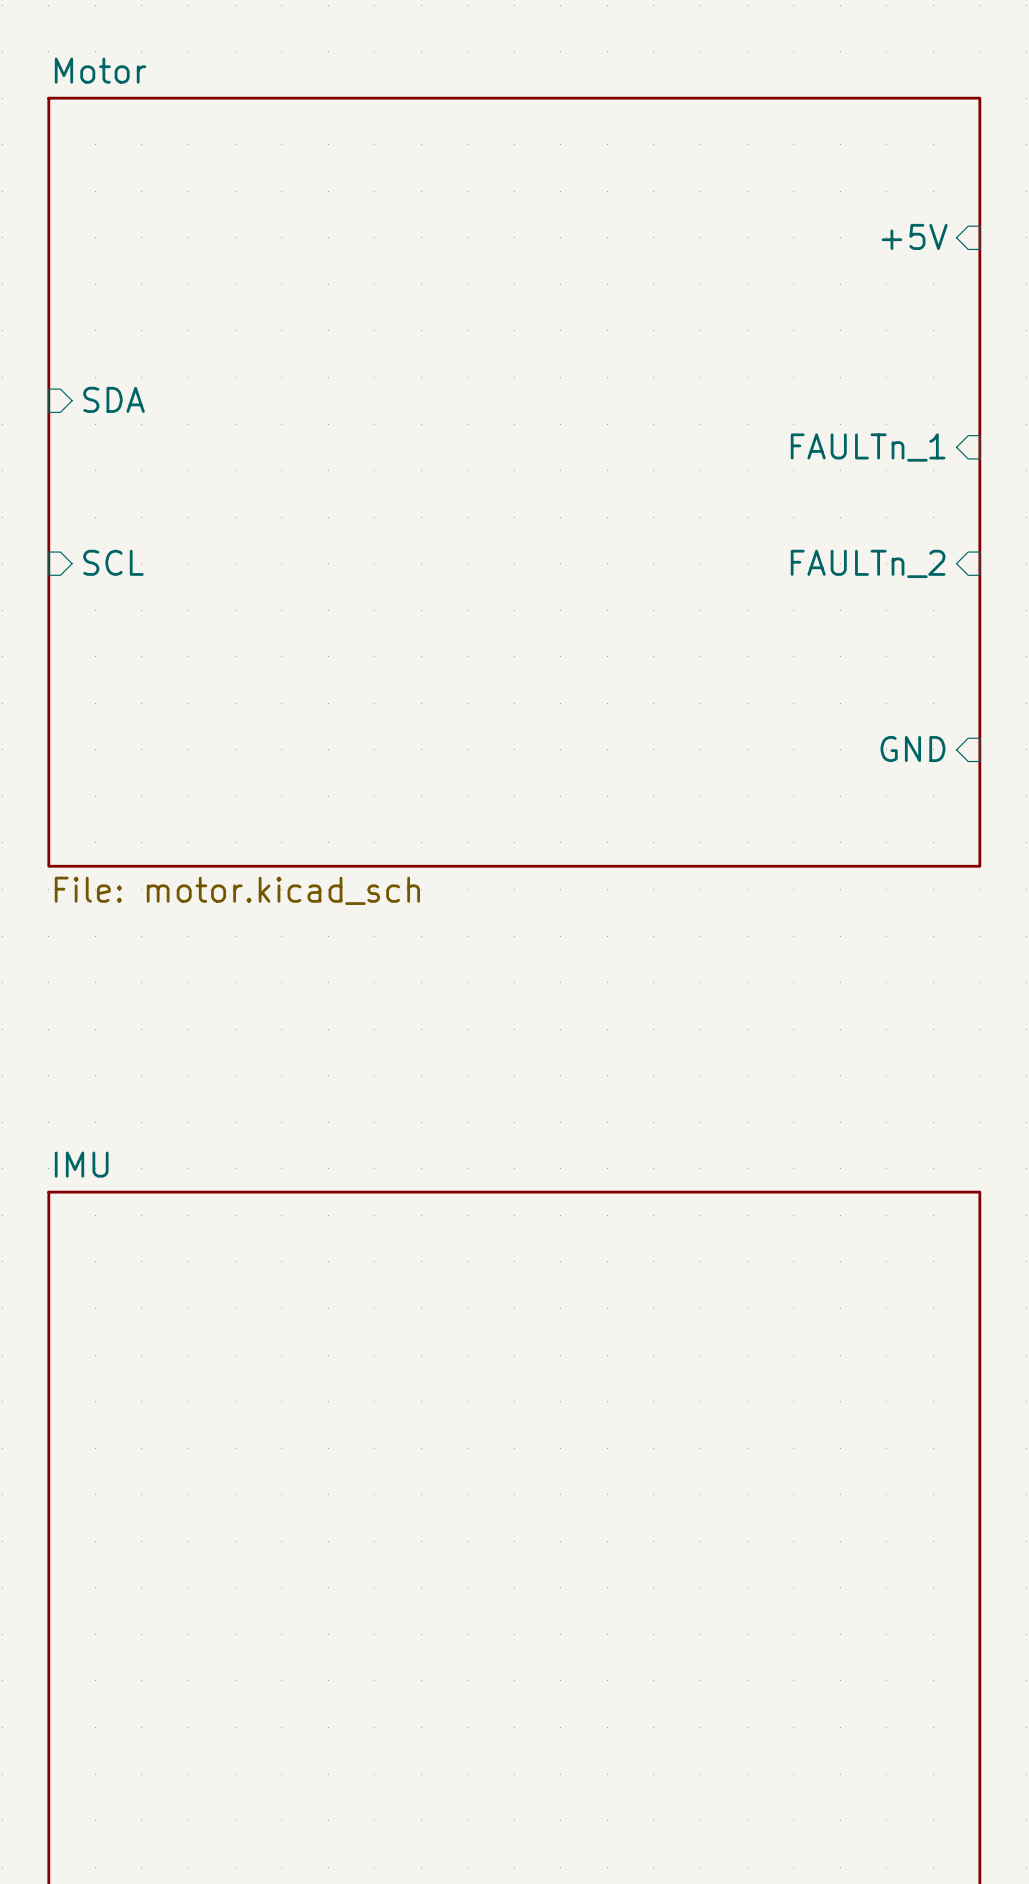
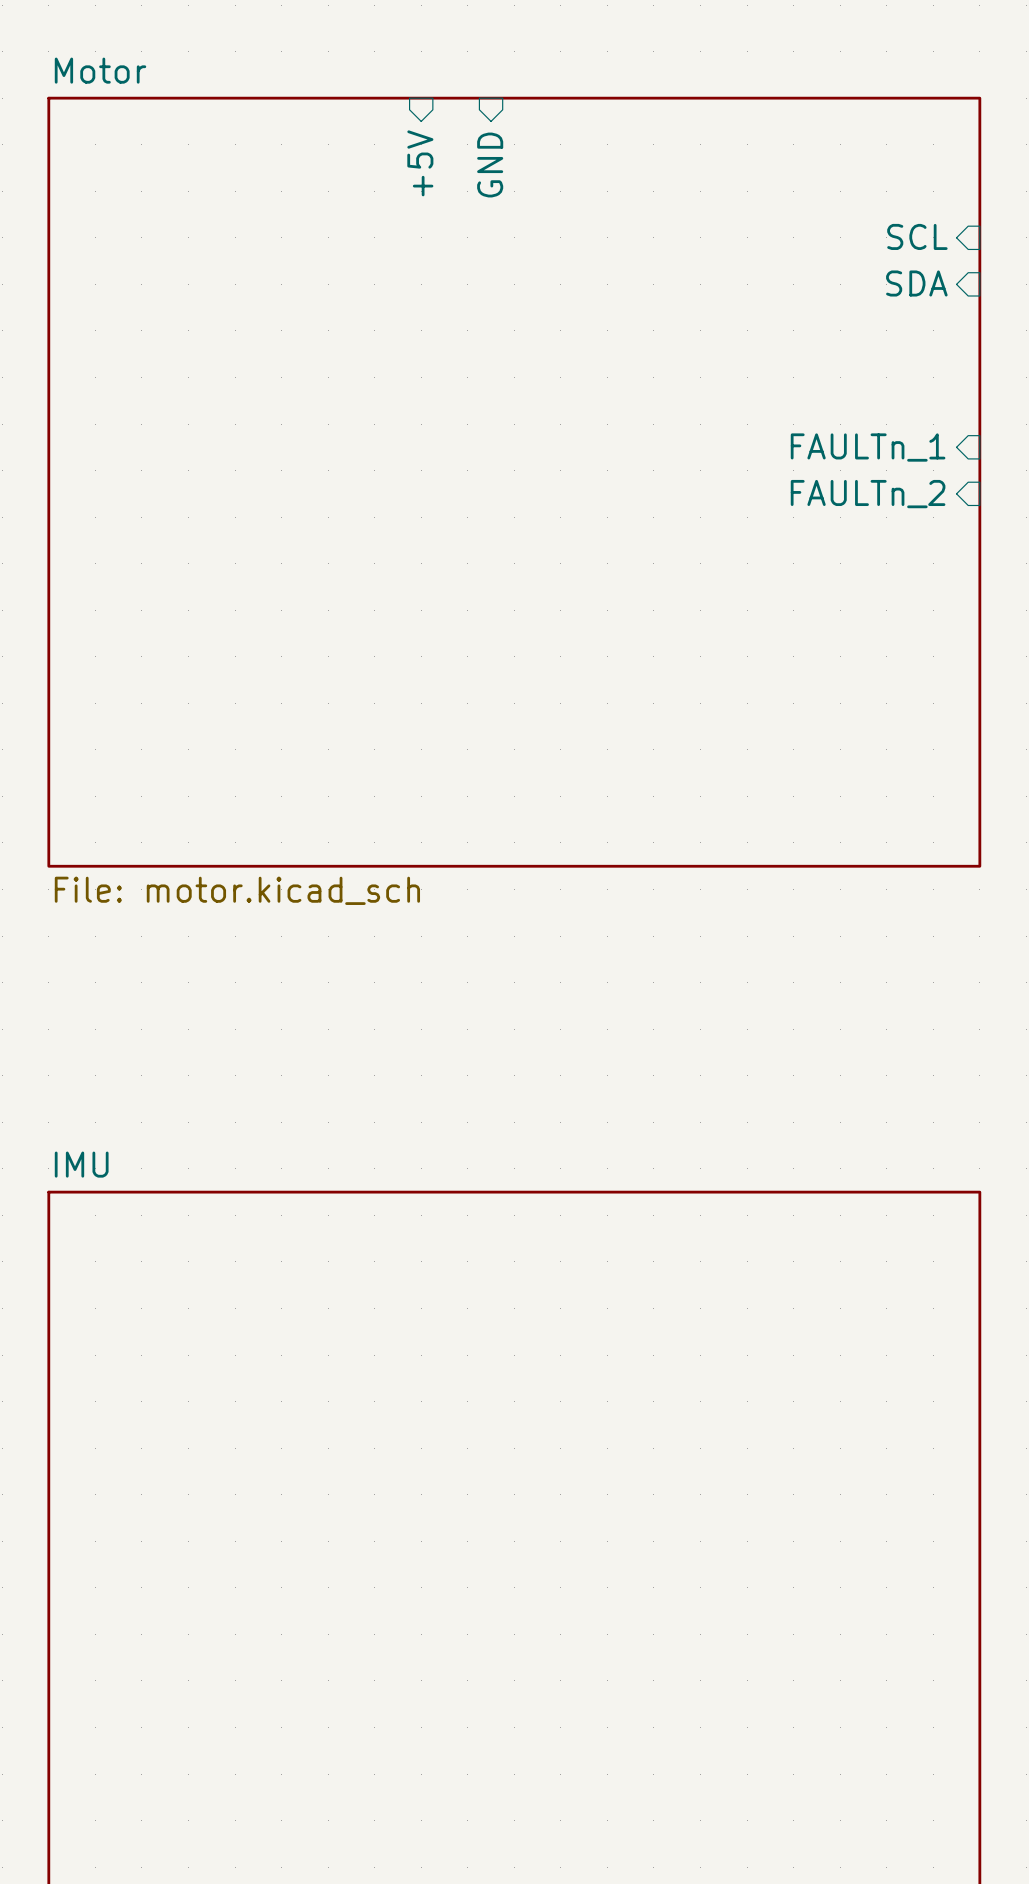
sheet pin: none -> +5V (420, 163)
sheet pin: none -> GND (490, 165)
sheet pin: +5V (914, 236) -> SCL (917, 236)
sheet pin: none -> SDA (916, 283)
sheet pin: SDA (114, 399) -> none
sheet pin: SCL (113, 562) -> none
sheet pin position: FAULTn_2 (868, 563) -> FAULTn_2 (868, 494)
sheet pin: GND (912, 749) -> none

